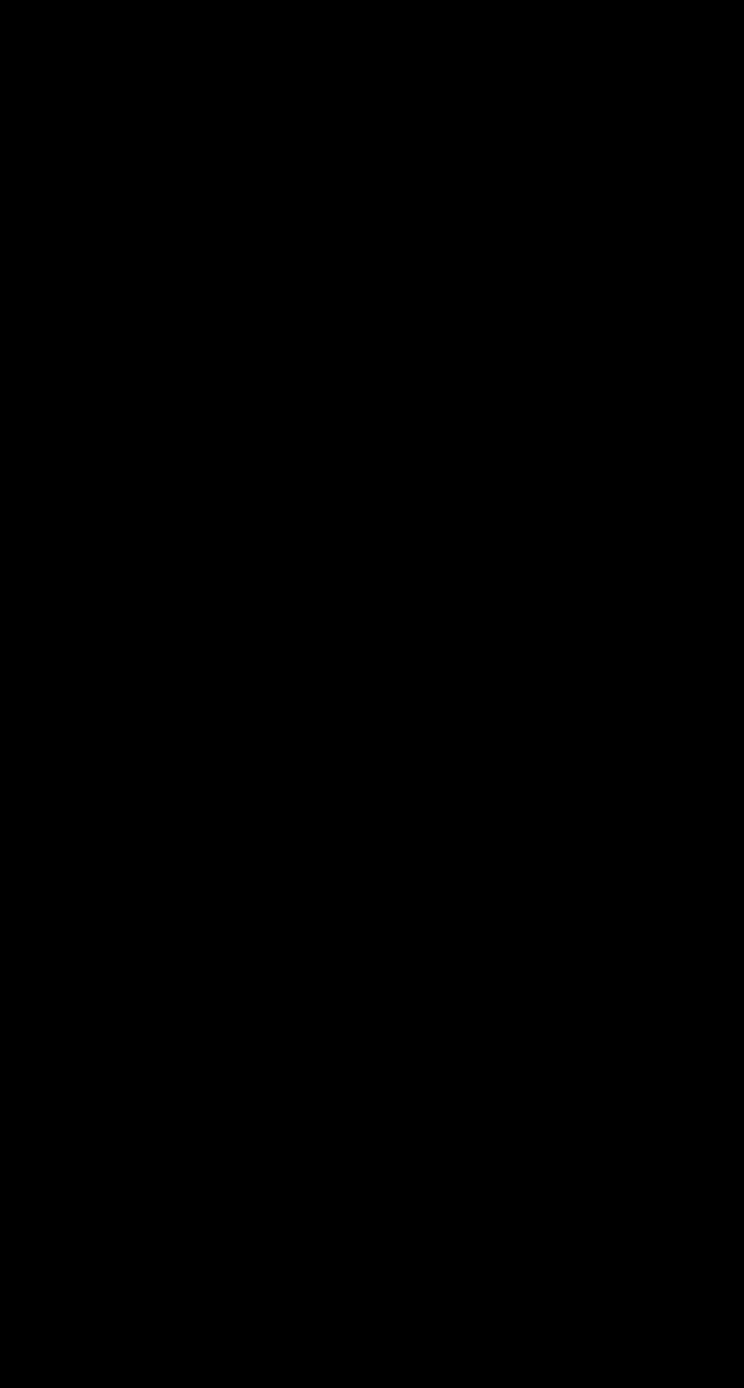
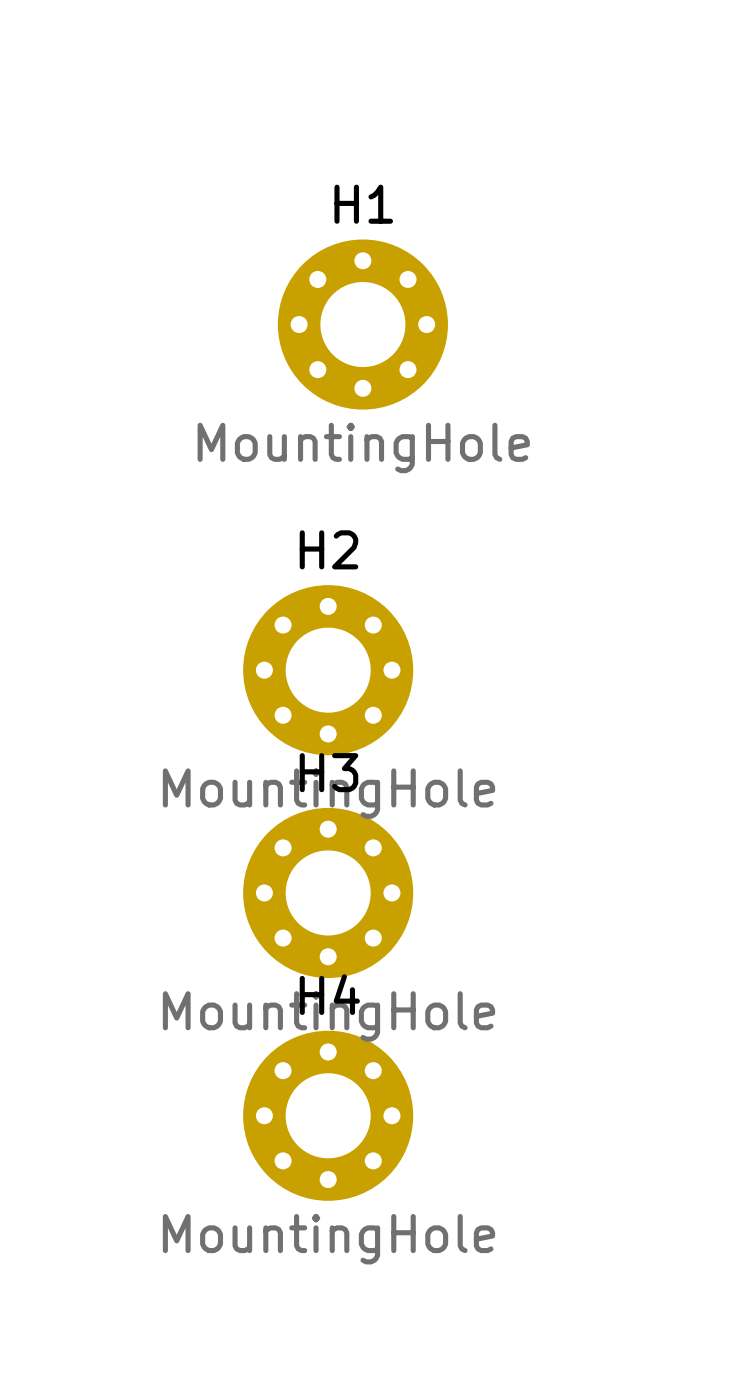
H1: none -> MountingHole (362, 324)
H2: none -> MountingHole (328, 670)
H3: none -> MountingHole (328, 892)
H4: none -> MountingHole (328, 1115)

